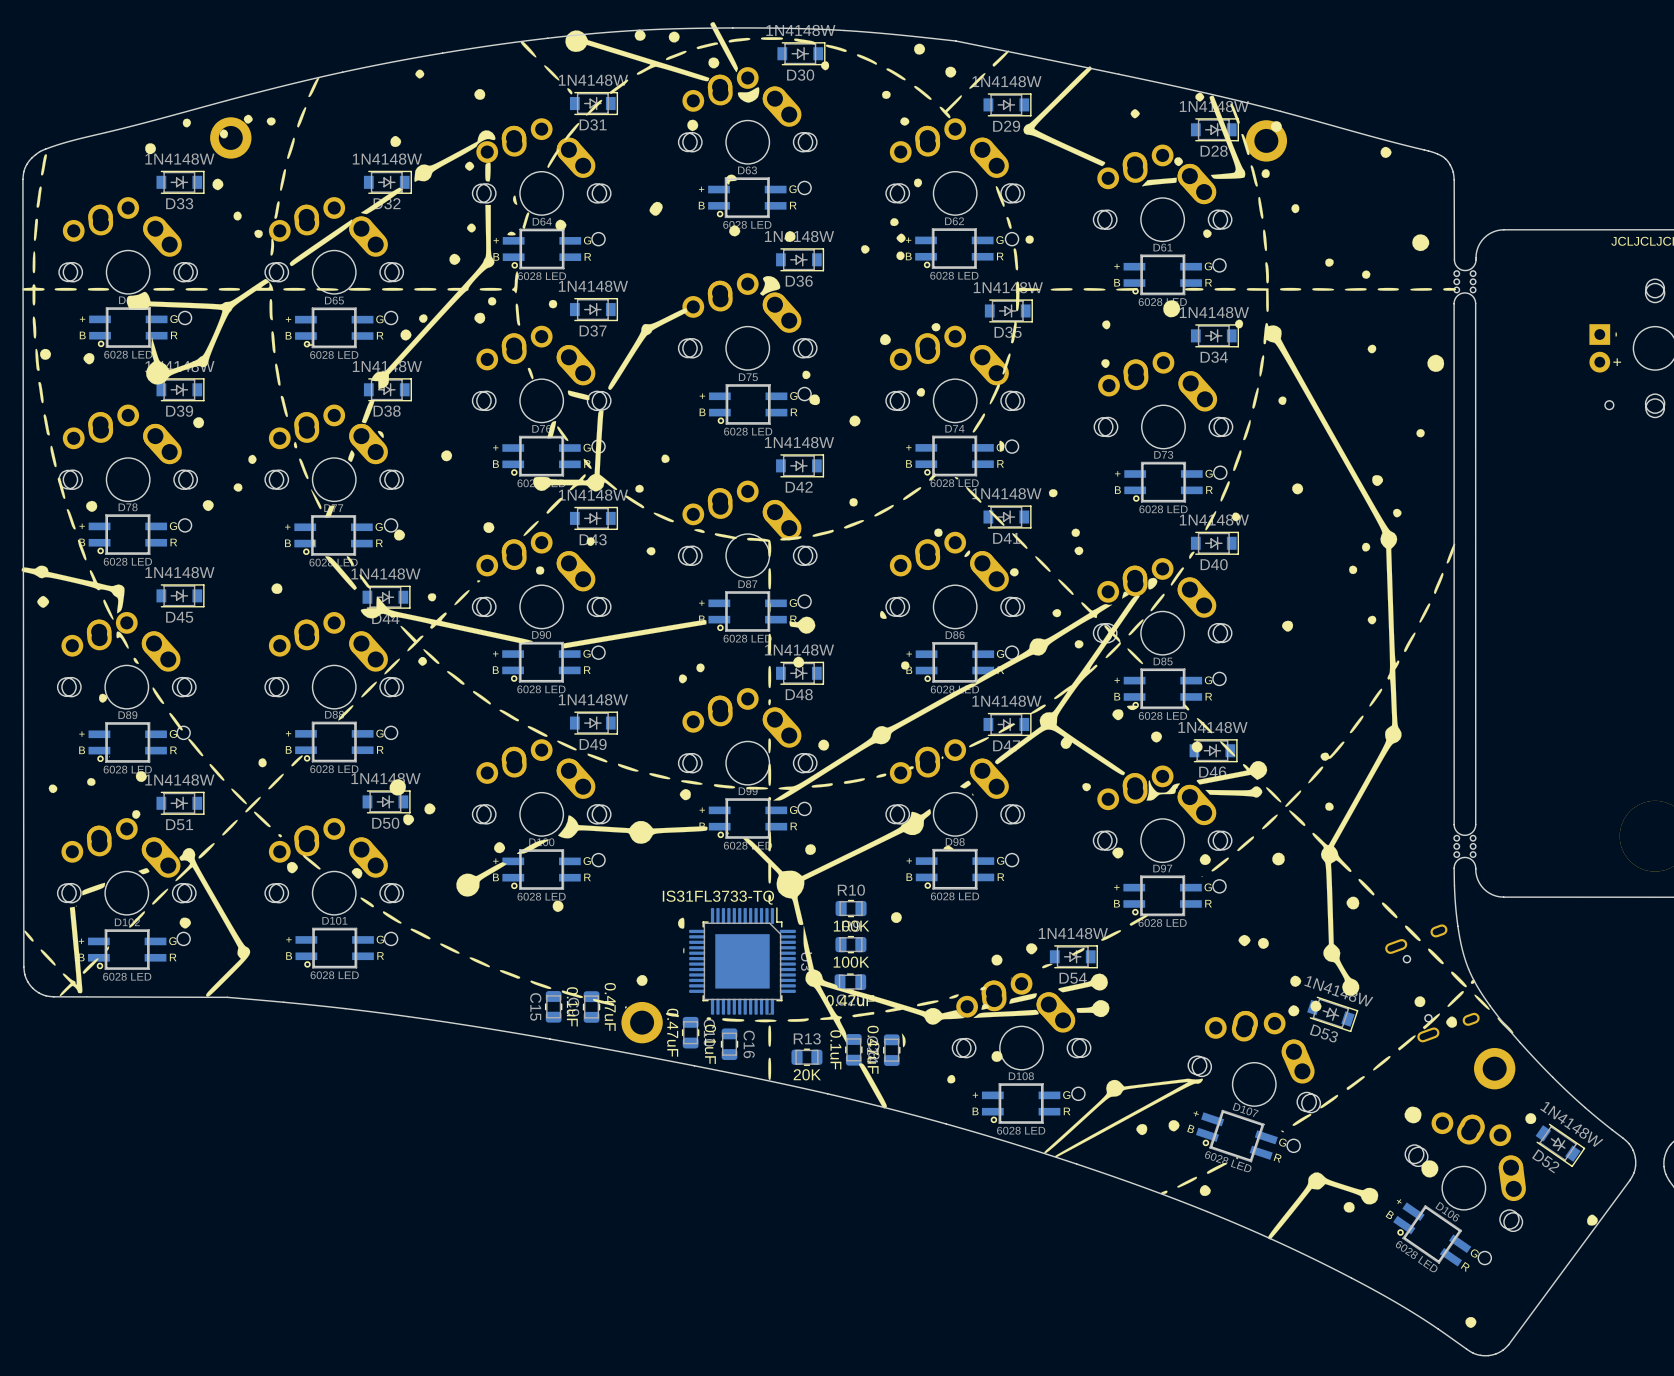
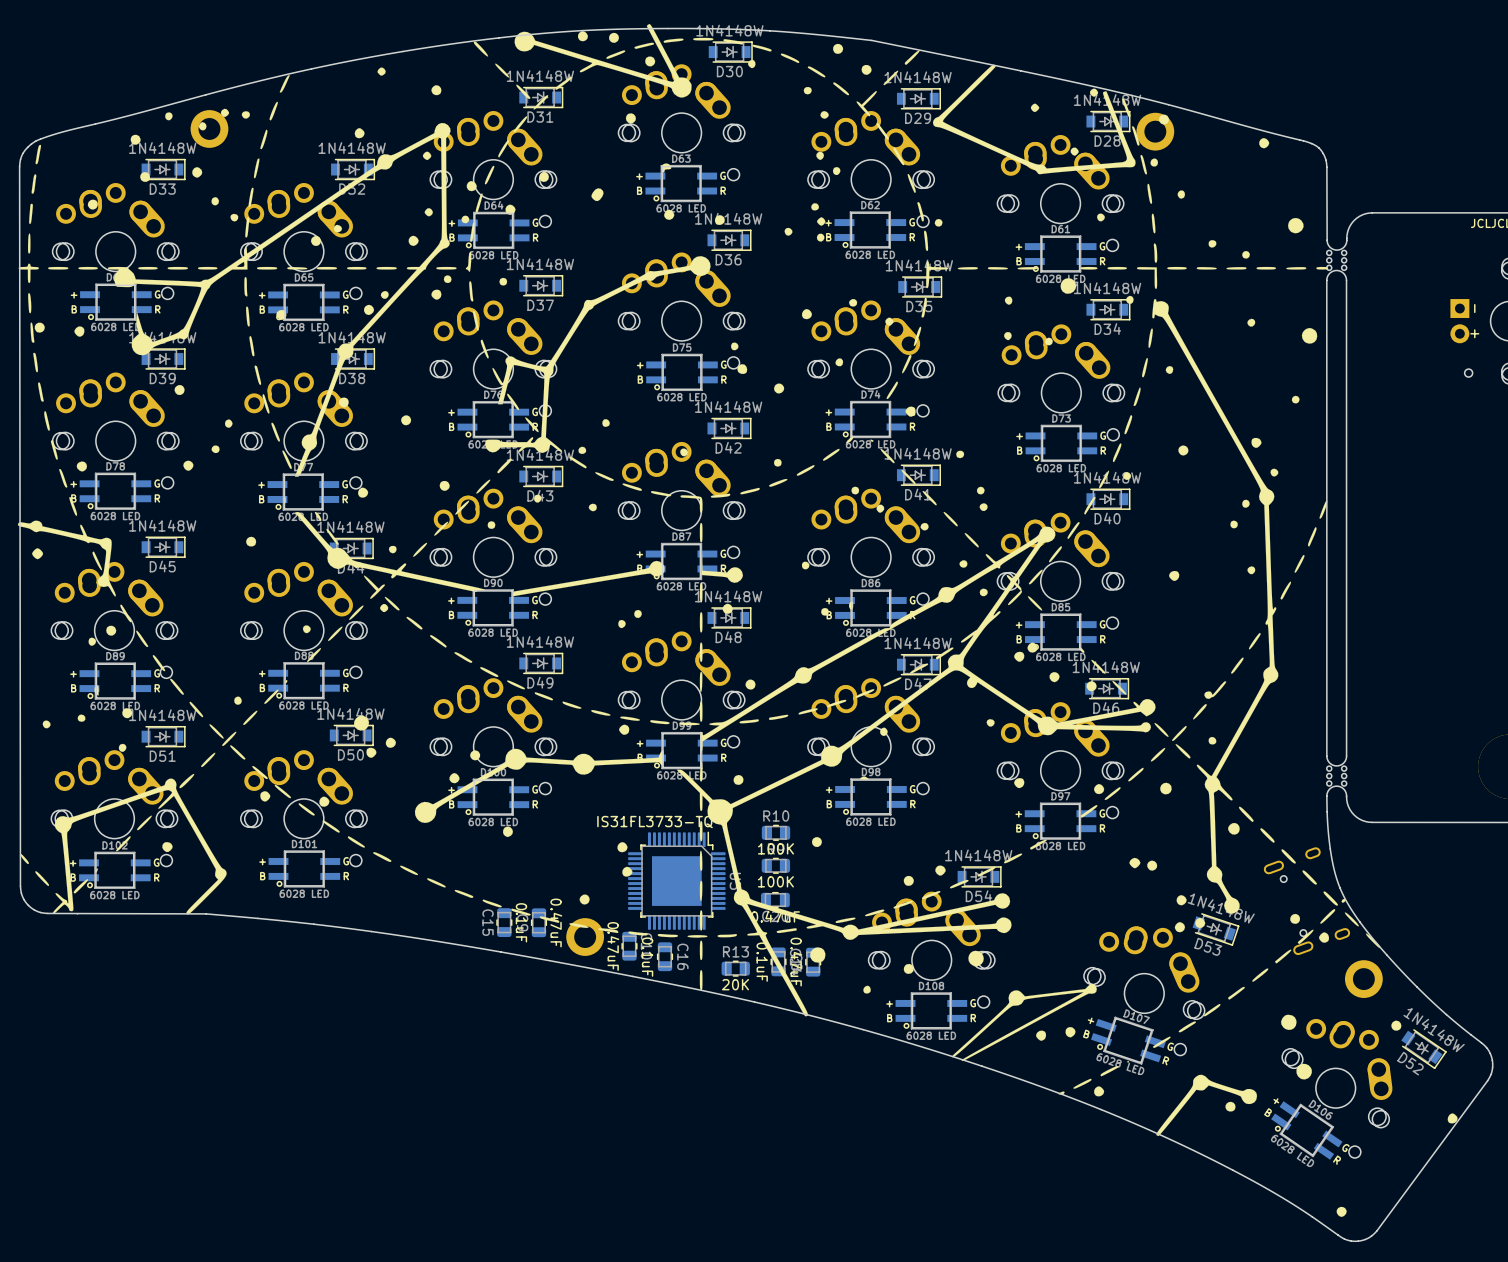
drawing shape: [21, 22, 1598, 1328] -> [17, 24, 1458, 1217]

